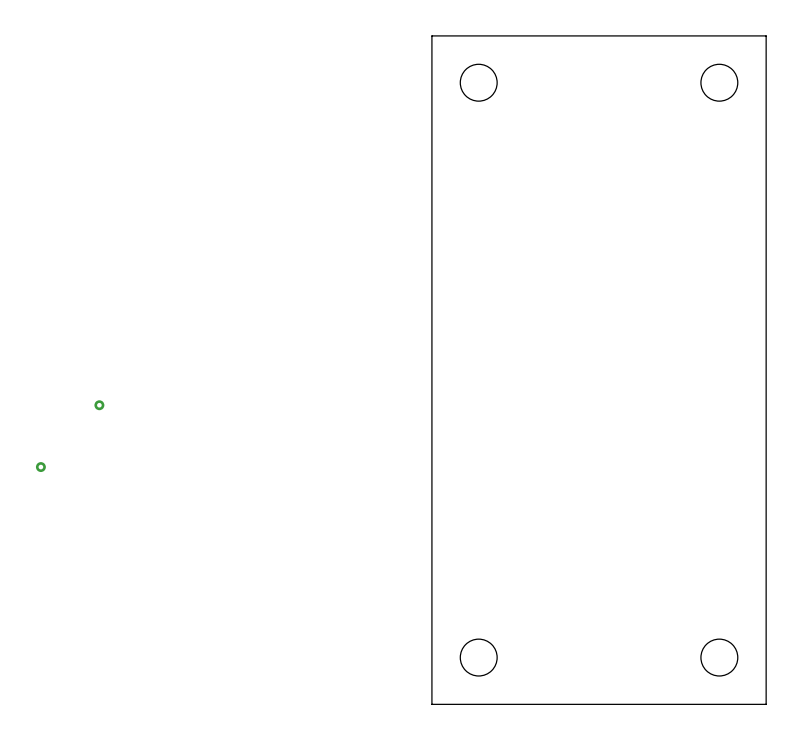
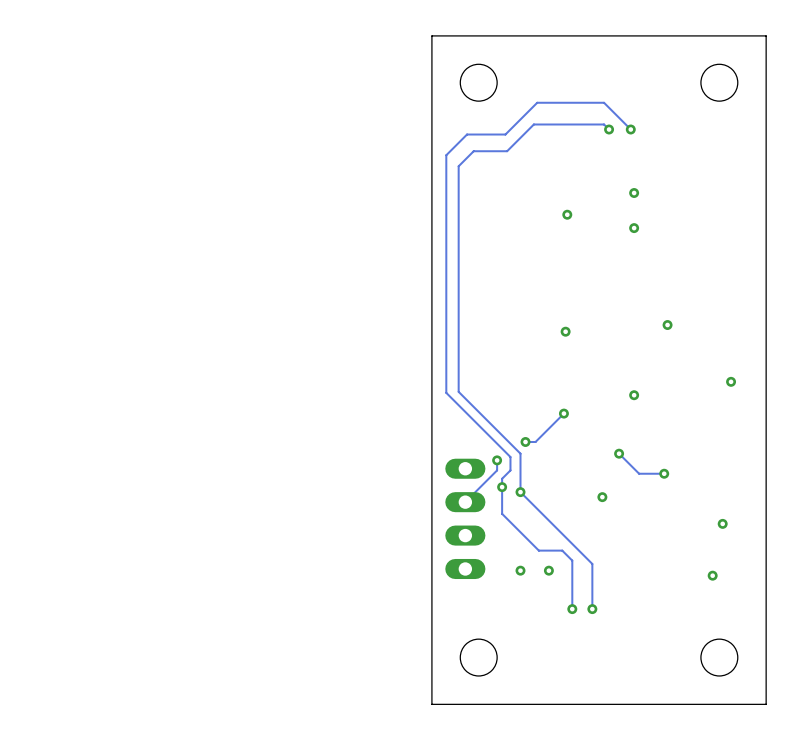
track: none -> (609, 129) (604, 124) (533, 124) (507, 151) (473, 151) (458, 166) (458, 391) (520, 453) (520, 492) (592, 563) (592, 609)
via: none -> (609, 129)
track: none -> (630, 129) (604, 102) (537, 102) (505, 134) (467, 134) (446, 155) (446, 392) (510, 457) (510, 470) (502, 478) (502, 513) (538, 550) (562, 550) (572, 560) (572, 609)
via: none -> (630, 129)
via: none -> (634, 193)
via: none -> (567, 214)
via: none -> (634, 228)
via: none -> (667, 325)
via: none -> (565, 331)
via: none -> (731, 381)
via: none -> (634, 395)
via: (99, 405) -> none
track: none -> (563, 413) (535, 441) (525, 441)
via: none -> (563, 413)
via: none -> (525, 441)
track: none -> (619, 453) (639, 473) (664, 473)
via: none -> (619, 453)
track: none -> (497, 460) (497, 470) (465, 502)
via: none -> (497, 460)
via: (40, 467) -> none
via: none -> (664, 473)
via: none -> (502, 487)
via: none -> (520, 492)
via: none -> (602, 497)
part: none -> (465, 518)
via: none -> (722, 523)
via: none -> (520, 570)
via: none -> (548, 570)
via: none -> (712, 575)
via: none -> (572, 609)
via: none -> (592, 609)

